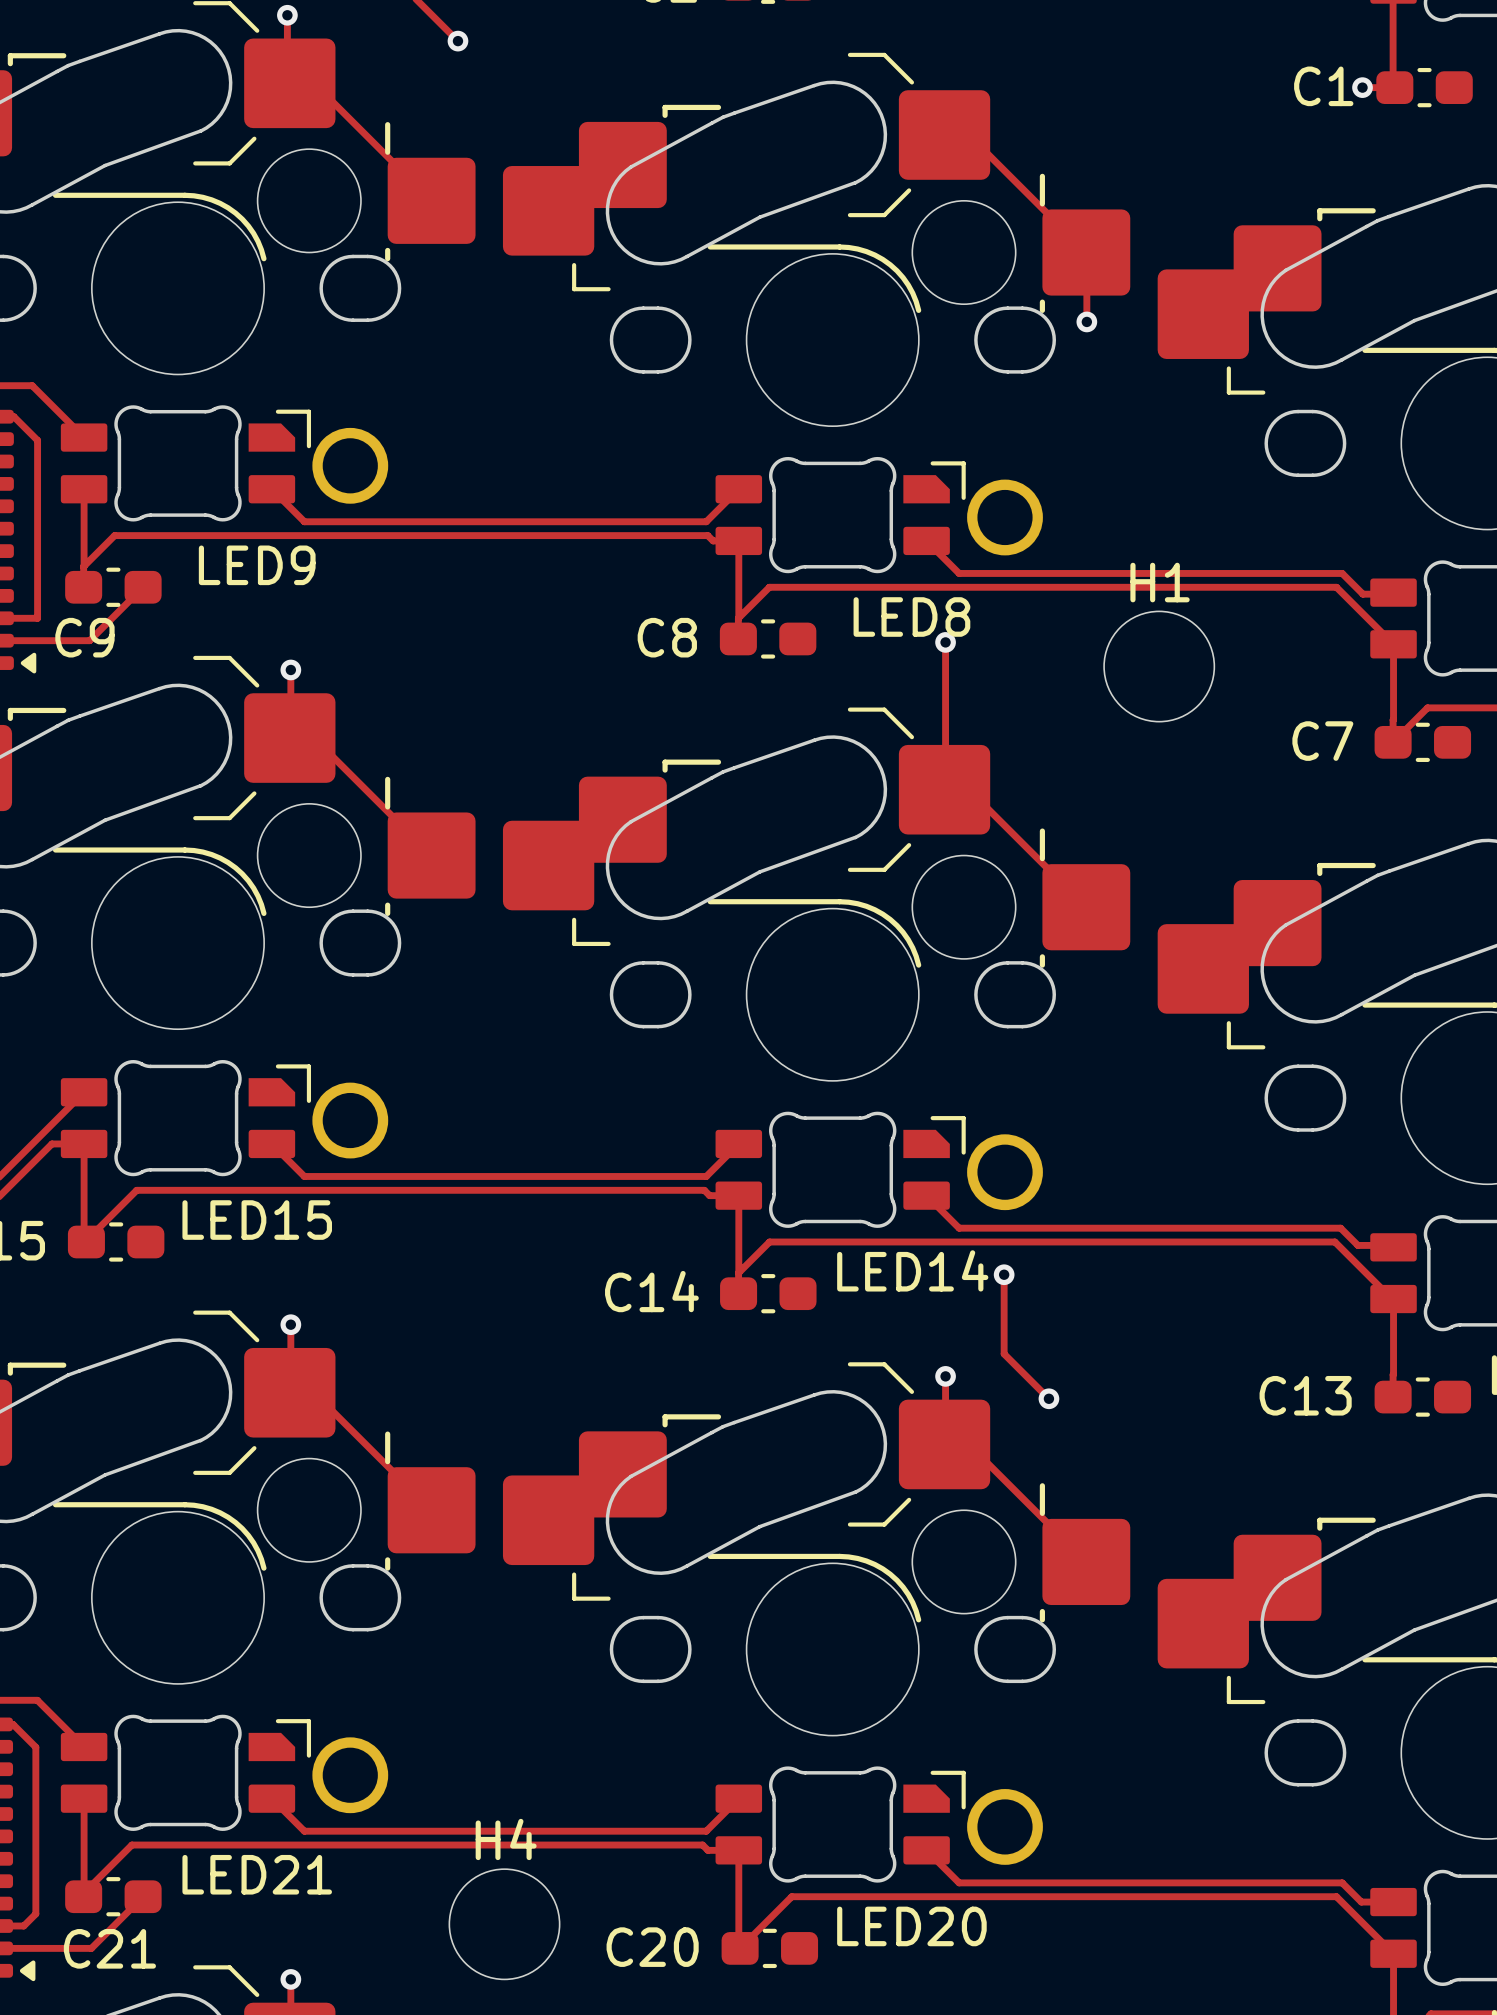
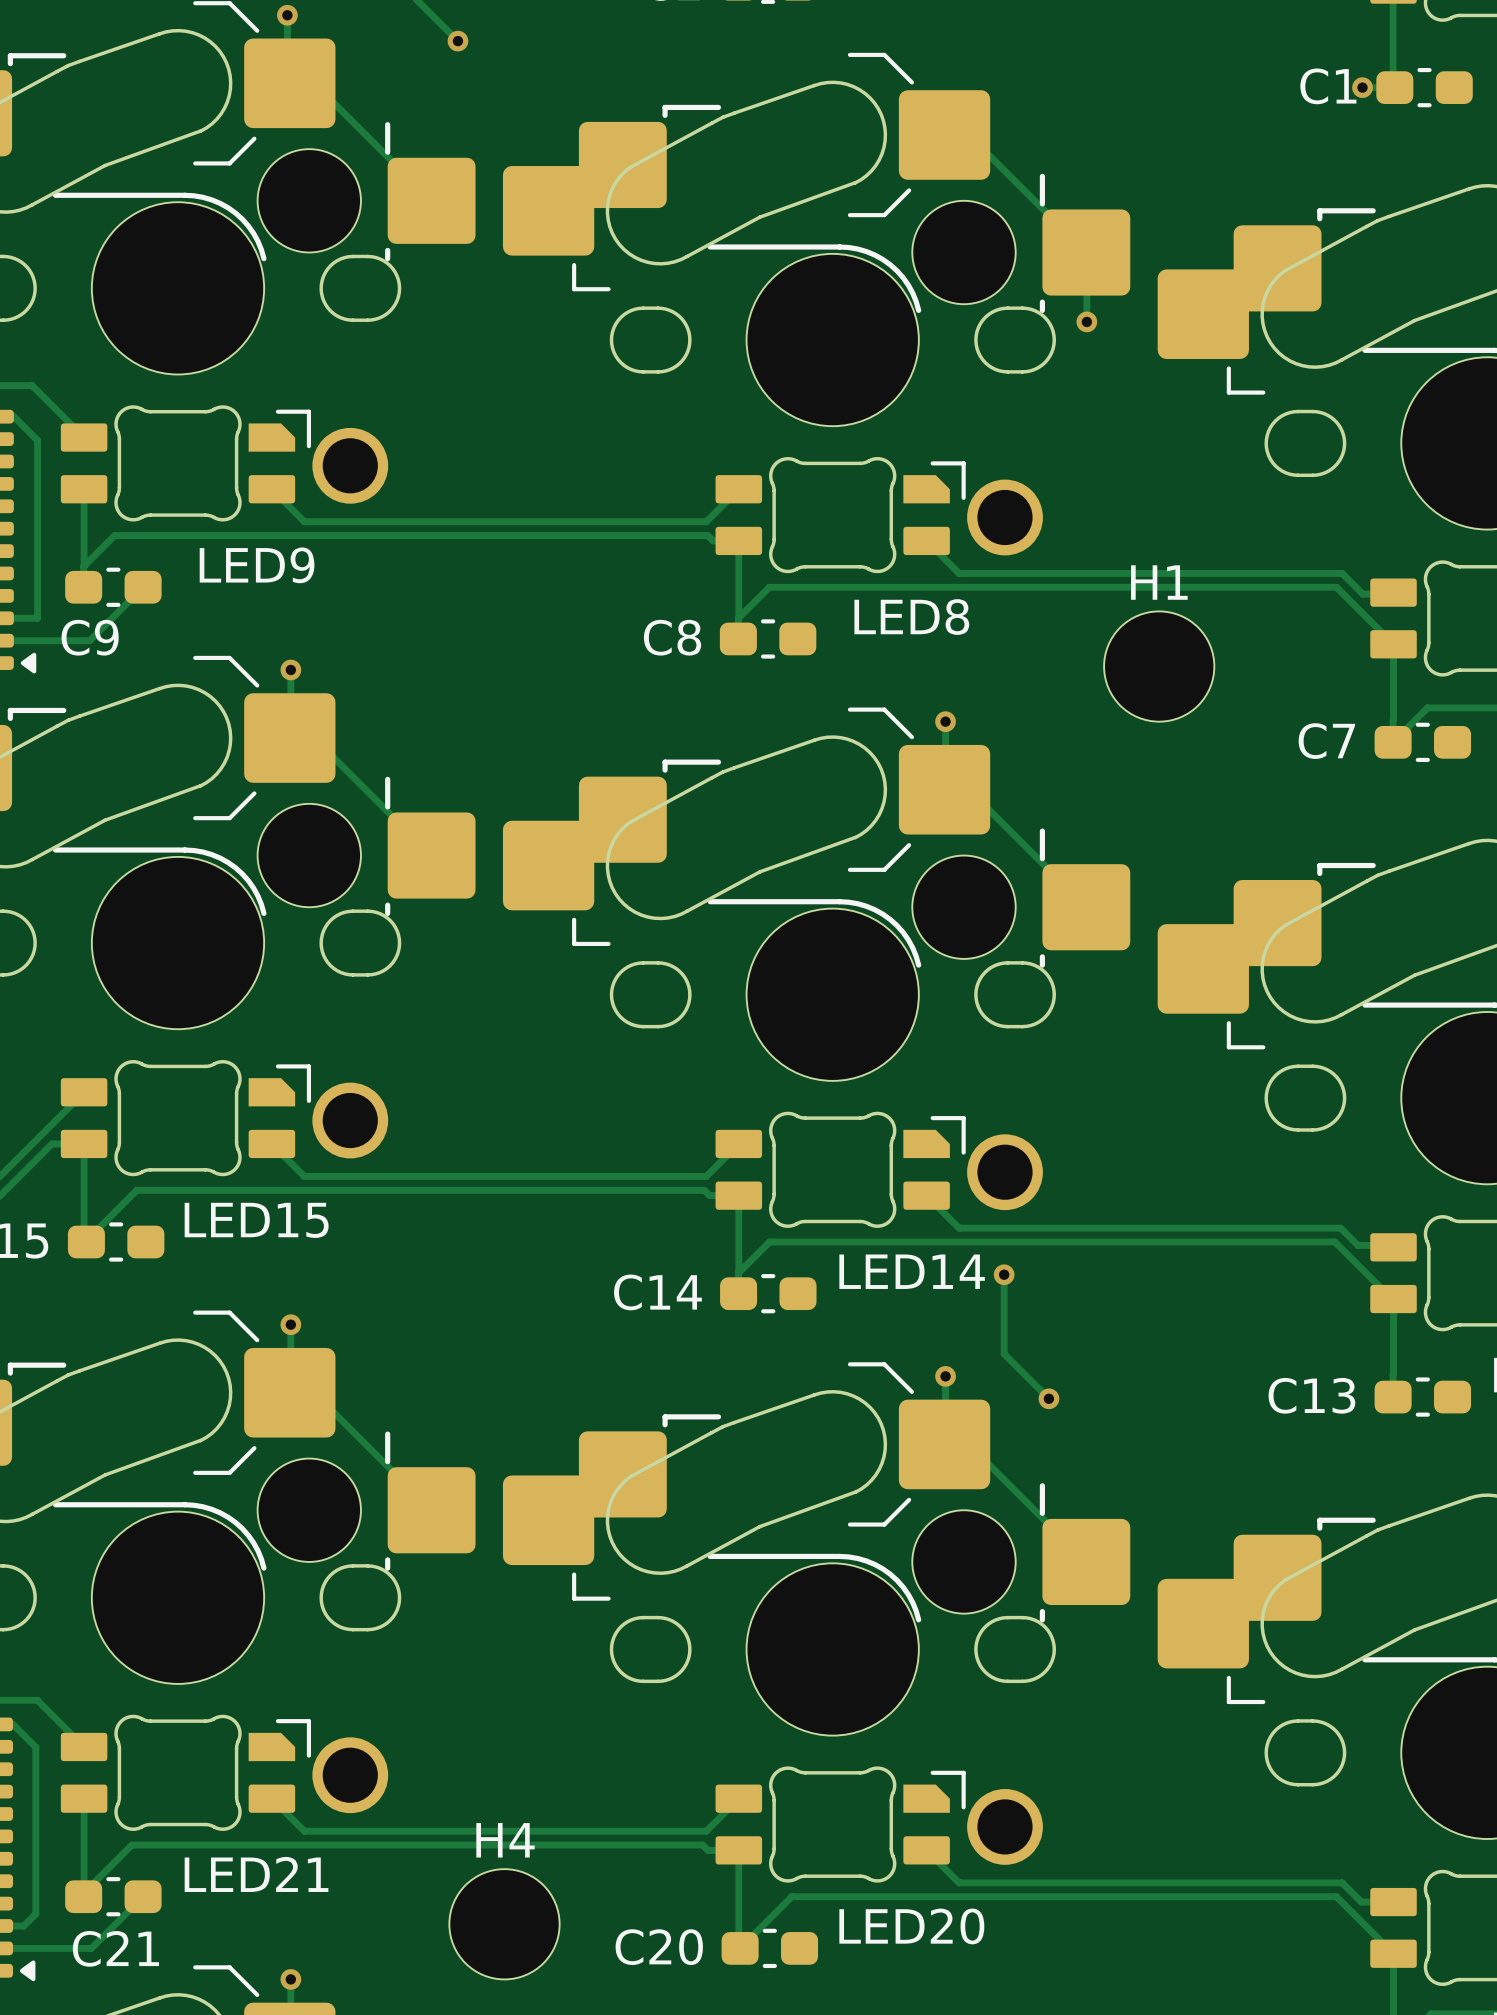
track: (945, 642) (945, 721) -> none
via position: (945, 642) -> (945, 721)

